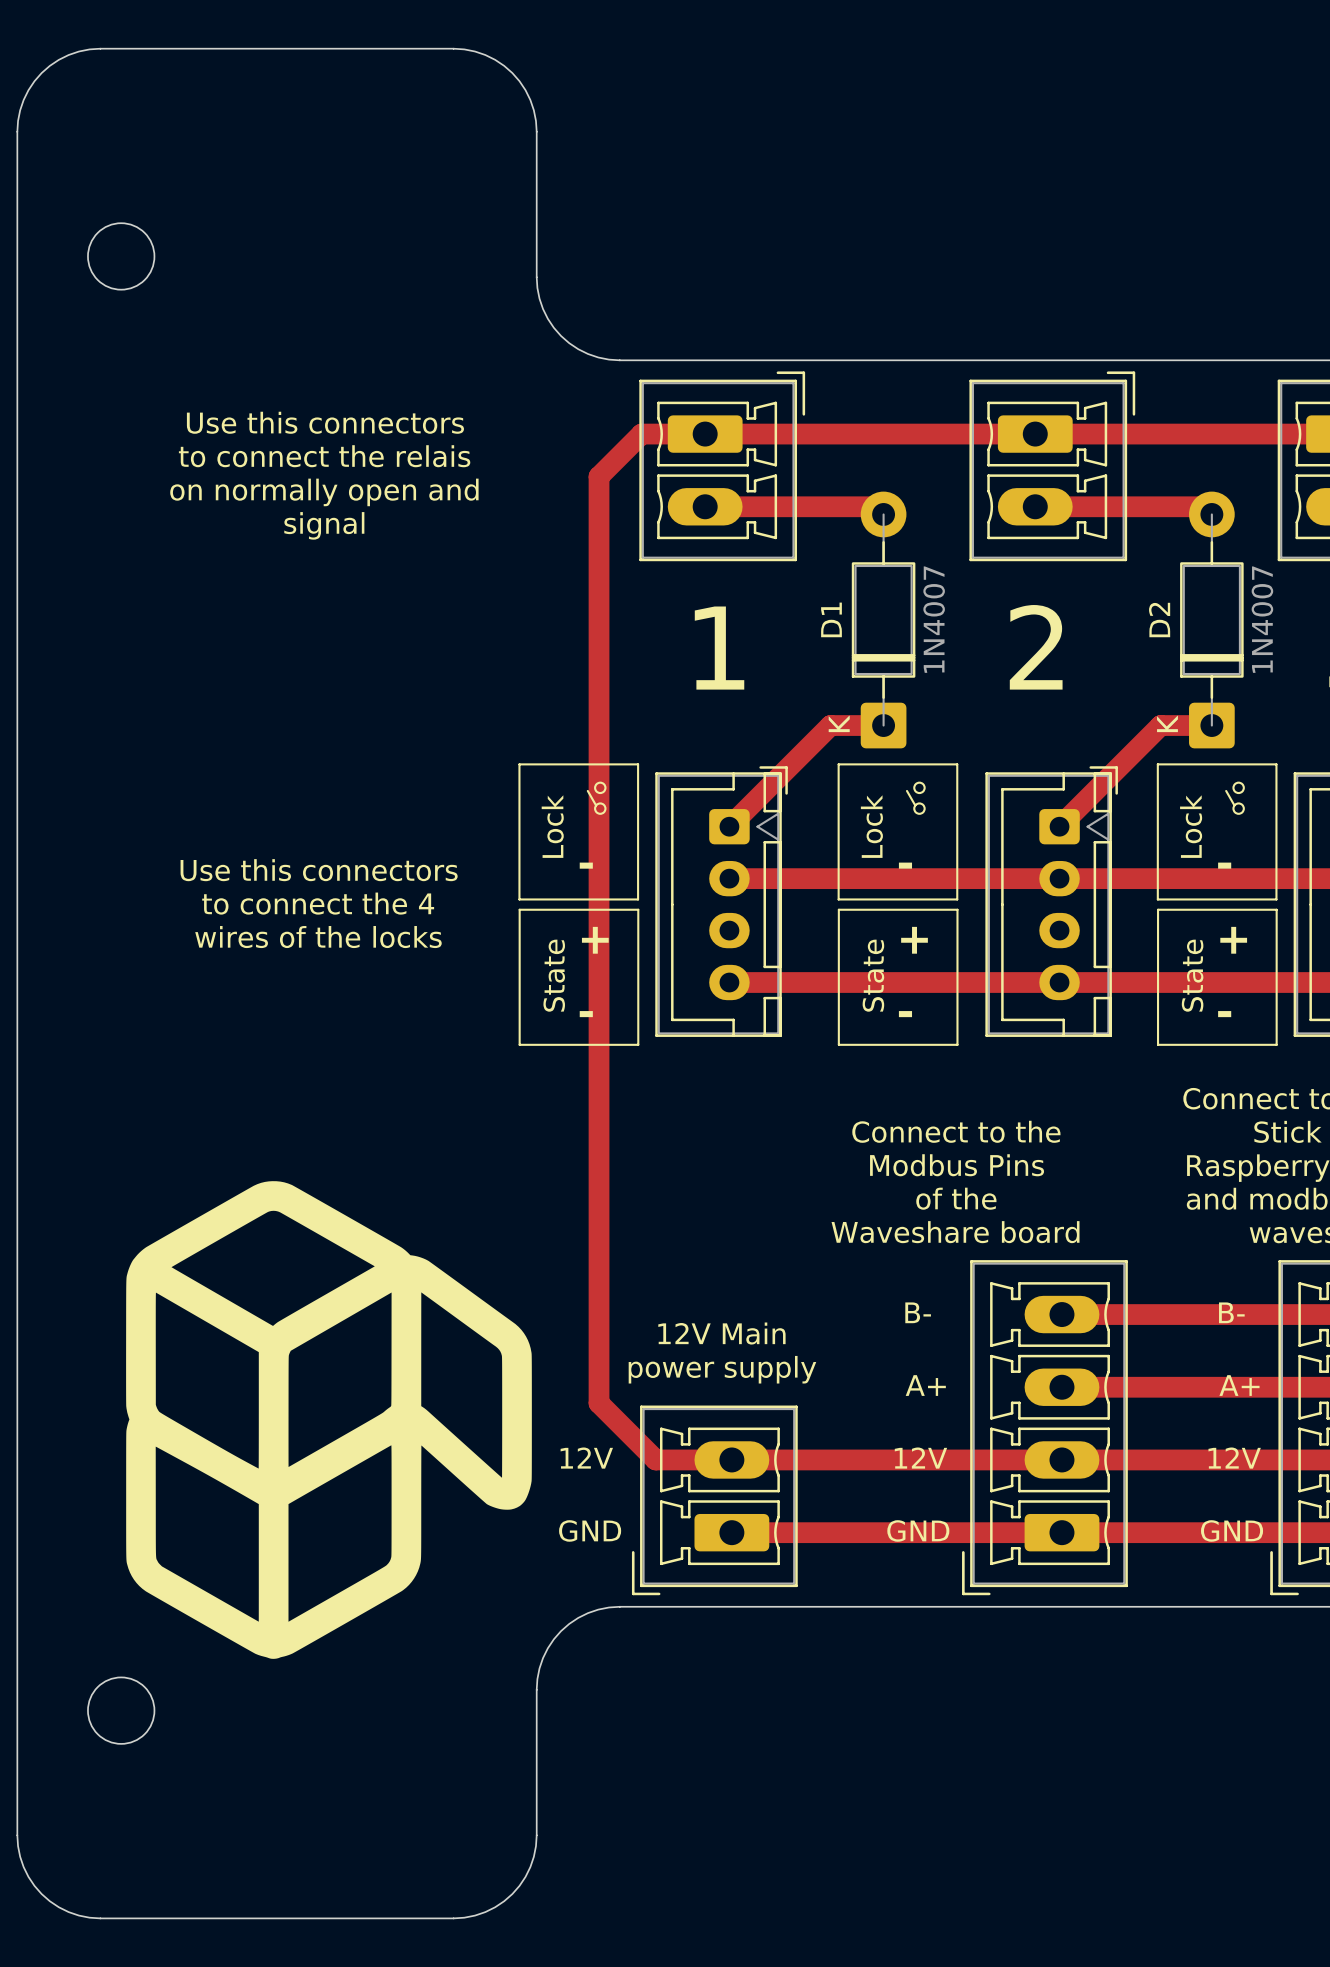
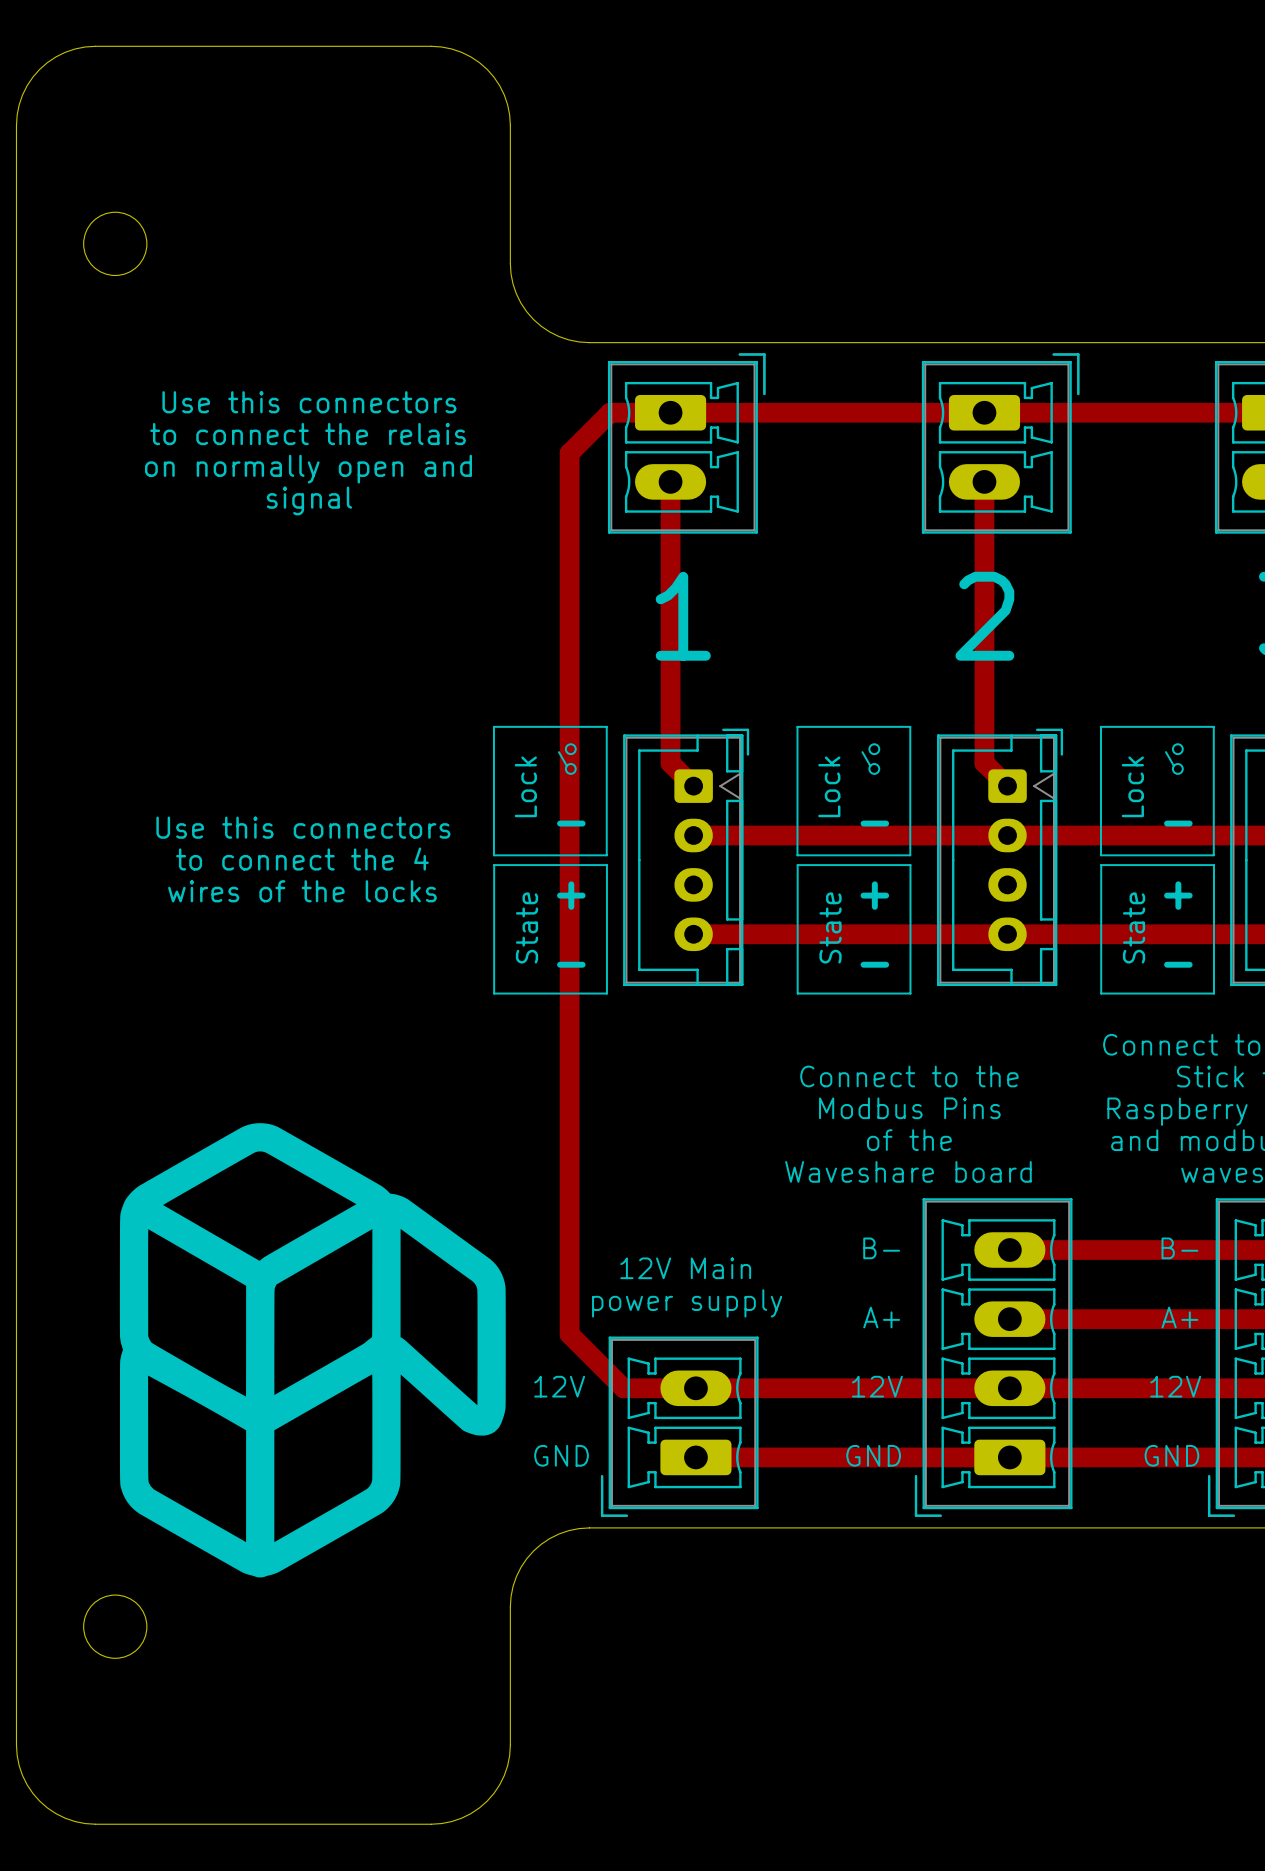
track: (705, 506) (875, 506) (883, 514) -> none
track: (1035, 506) (1204, 506) (1211, 514) -> none
D1: 1N4007 (883, 619) -> none
D2: 1N4007 (1211, 619) -> none
track: (883, 725) (830, 725) (729, 826) -> (670, 481) (670, 763) (693, 786)
track: (1211, 725) (1160, 725) (1059, 826) -> (984, 481) (984, 763) (1007, 786)

